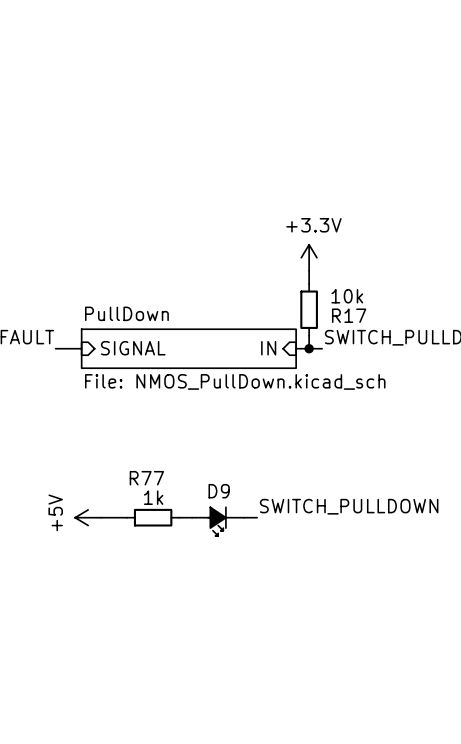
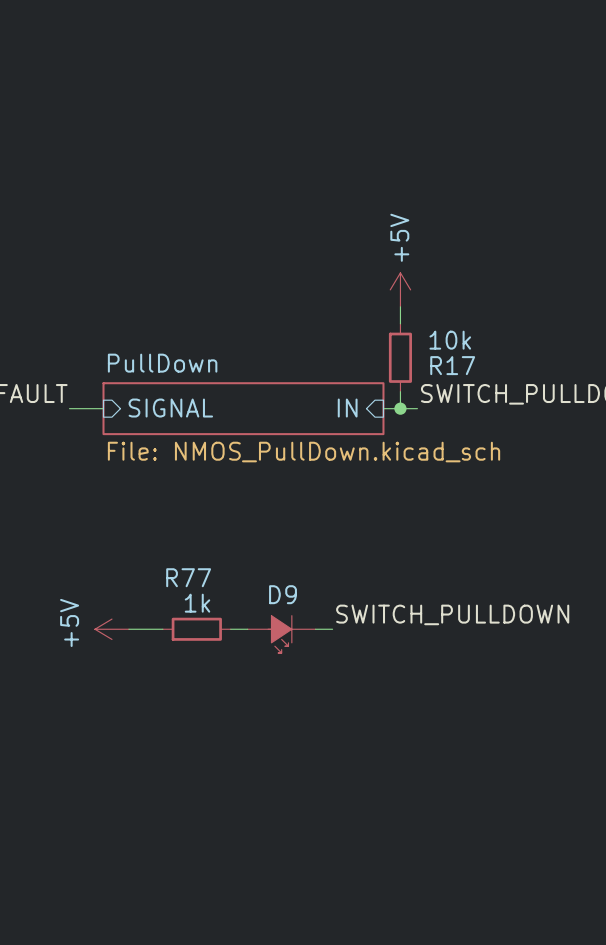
power symbol: +3.3V (309, 257) -> +5V (400, 289)

